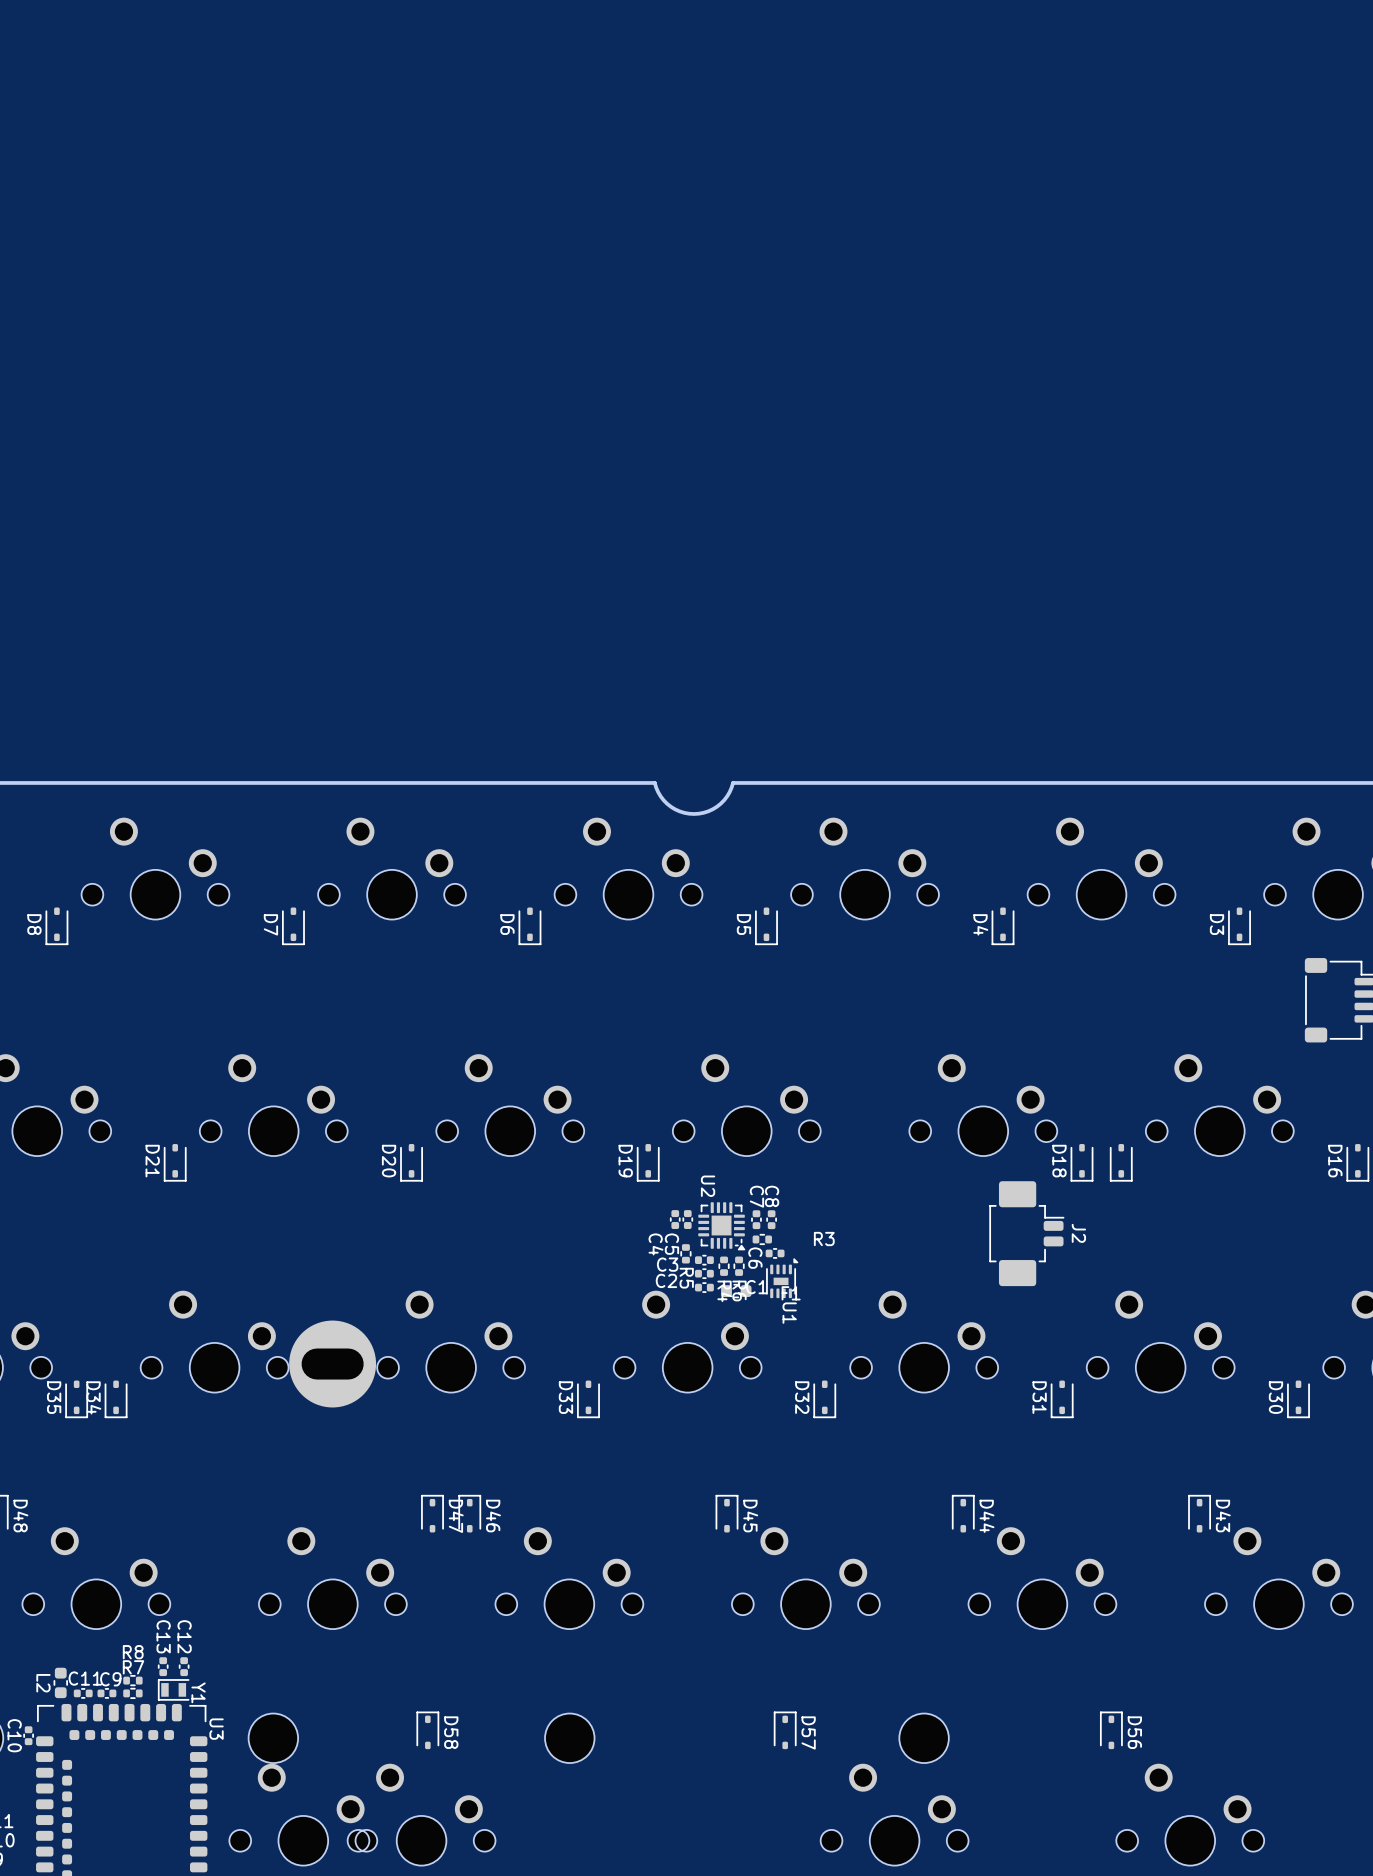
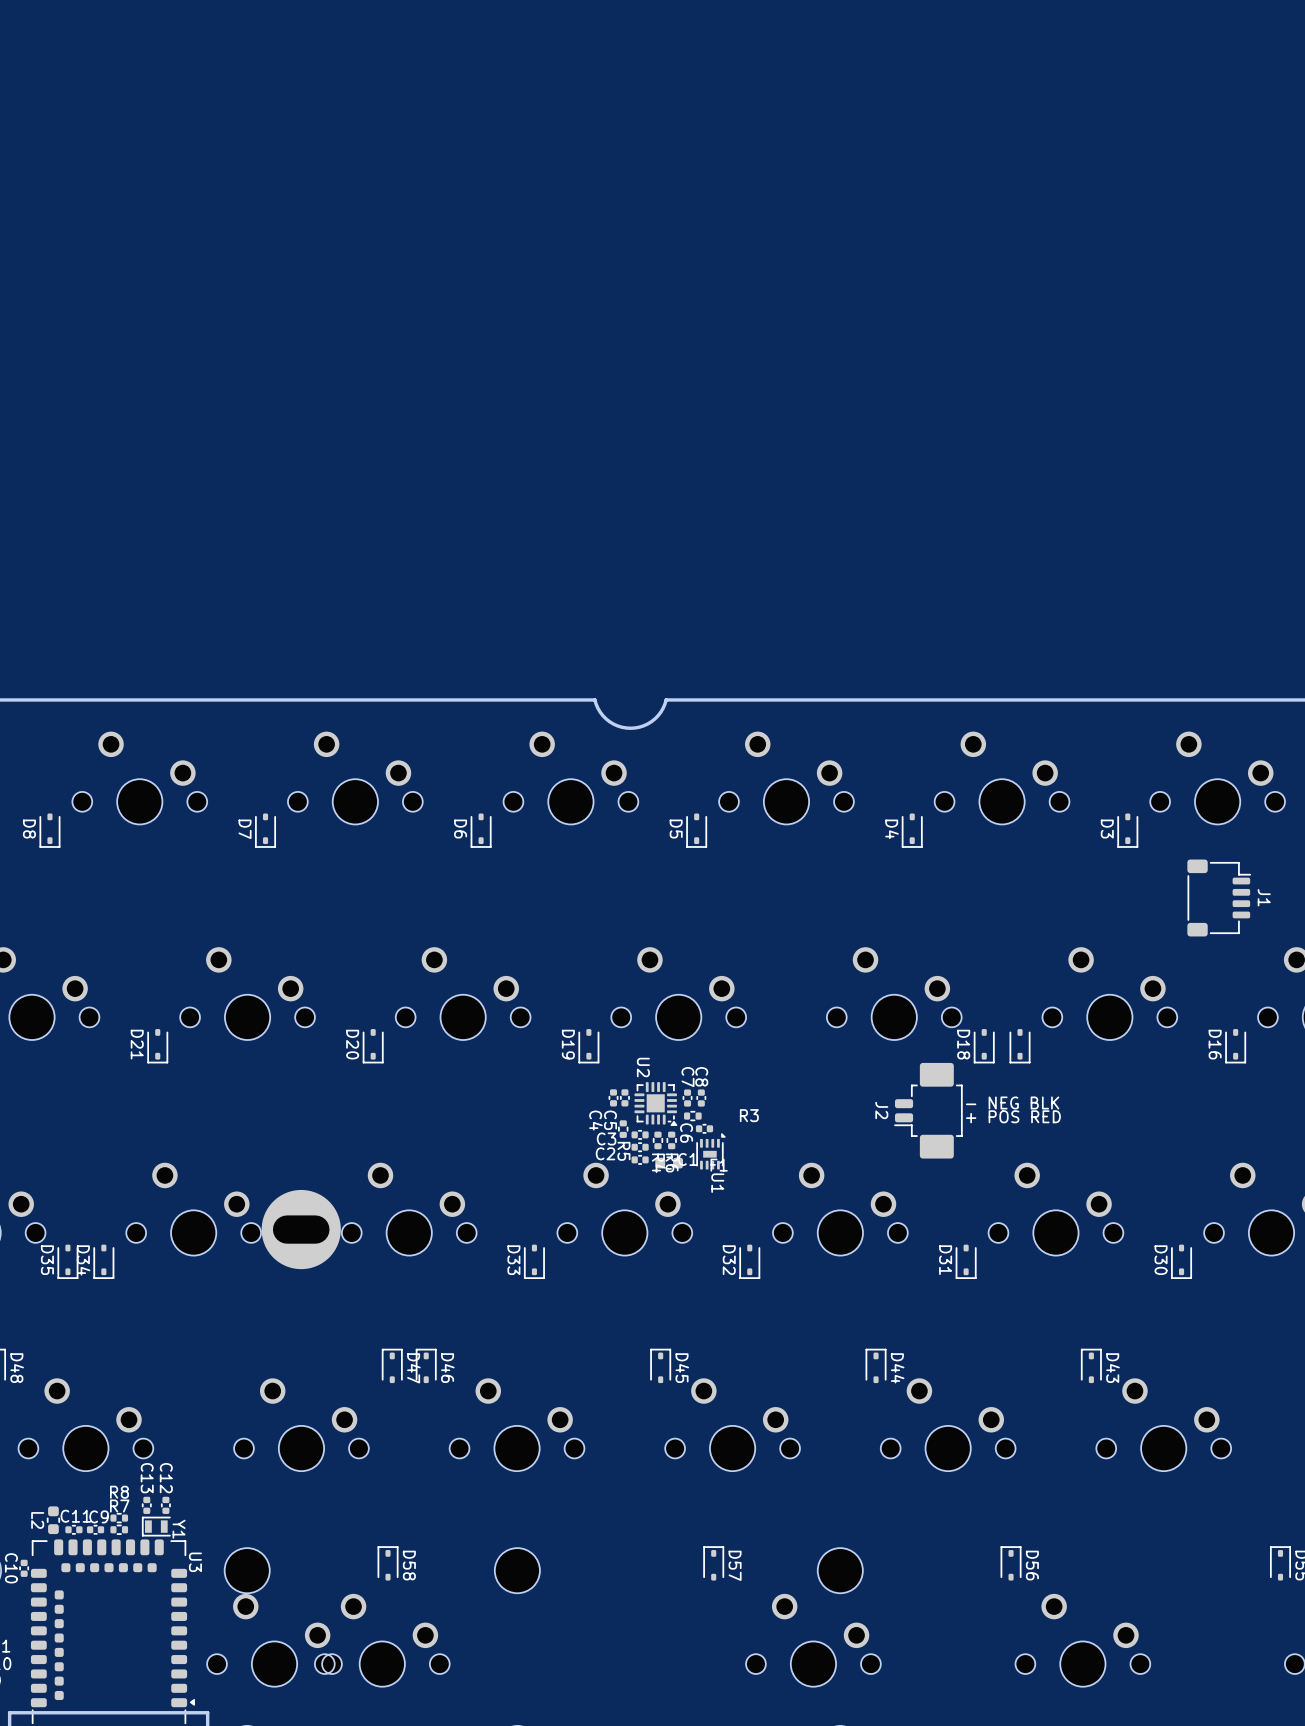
text: none -> - NEG BLK (1012, 1102)
J2 rotation: 0° (1026, 1233) -> 180° (928, 1110)
text: none -> + POS RED (1013, 1116)

